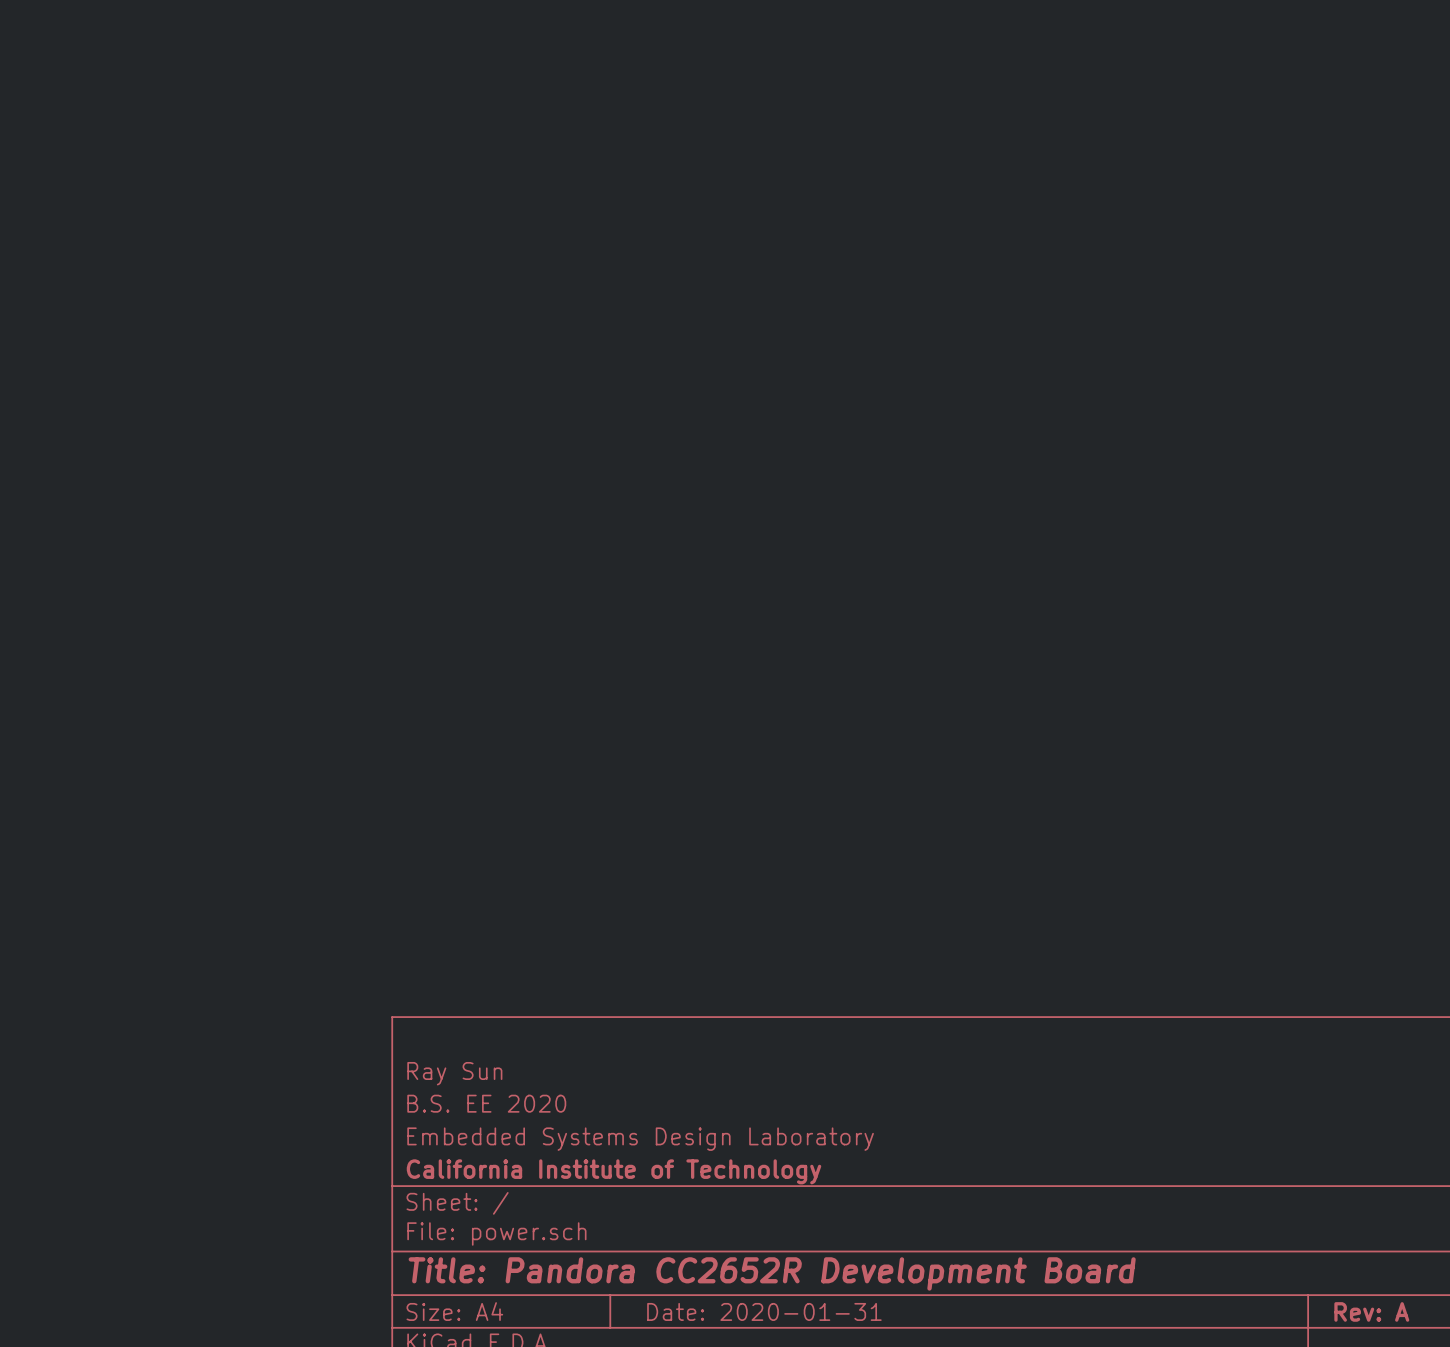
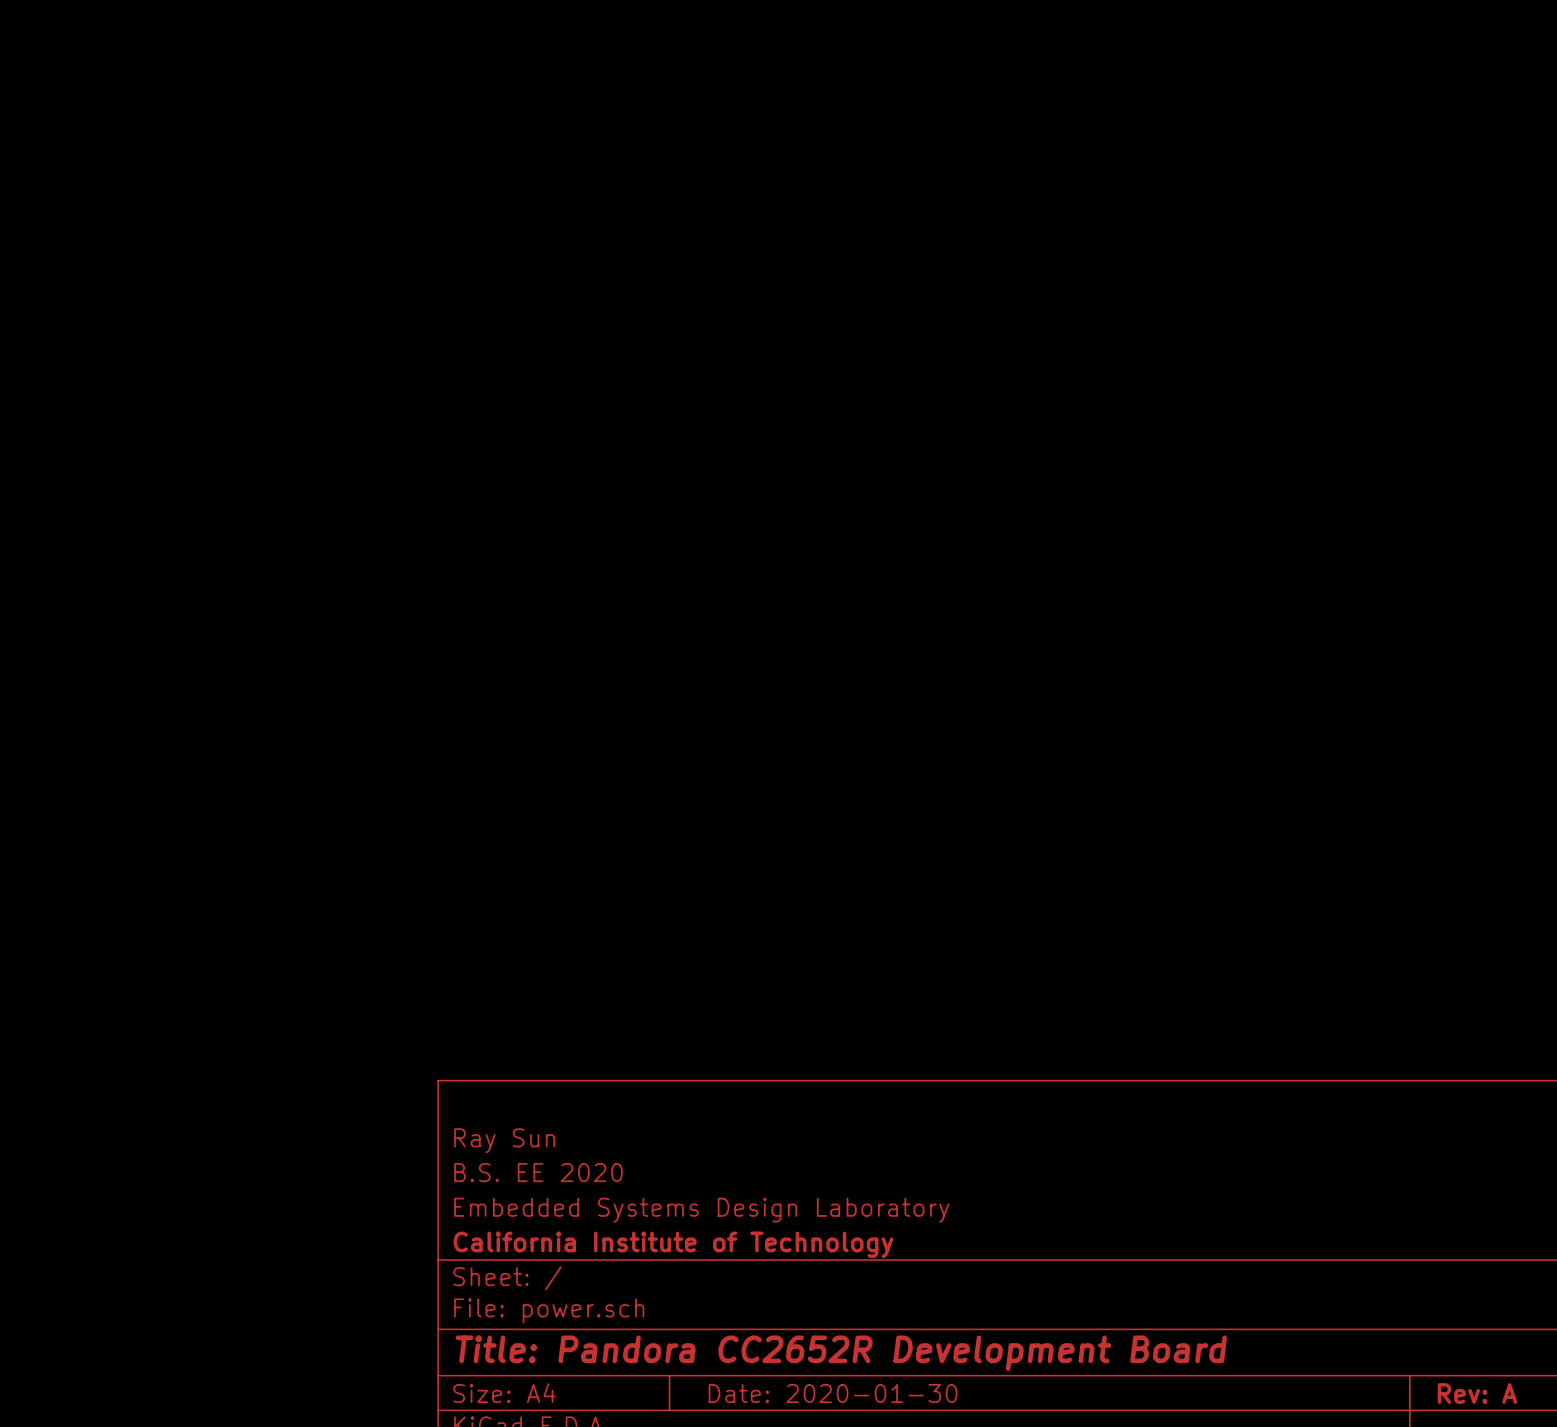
title block: Date: 2020-01-31 (764, 1311) -> Date: 2020-01-30 (833, 1393)

